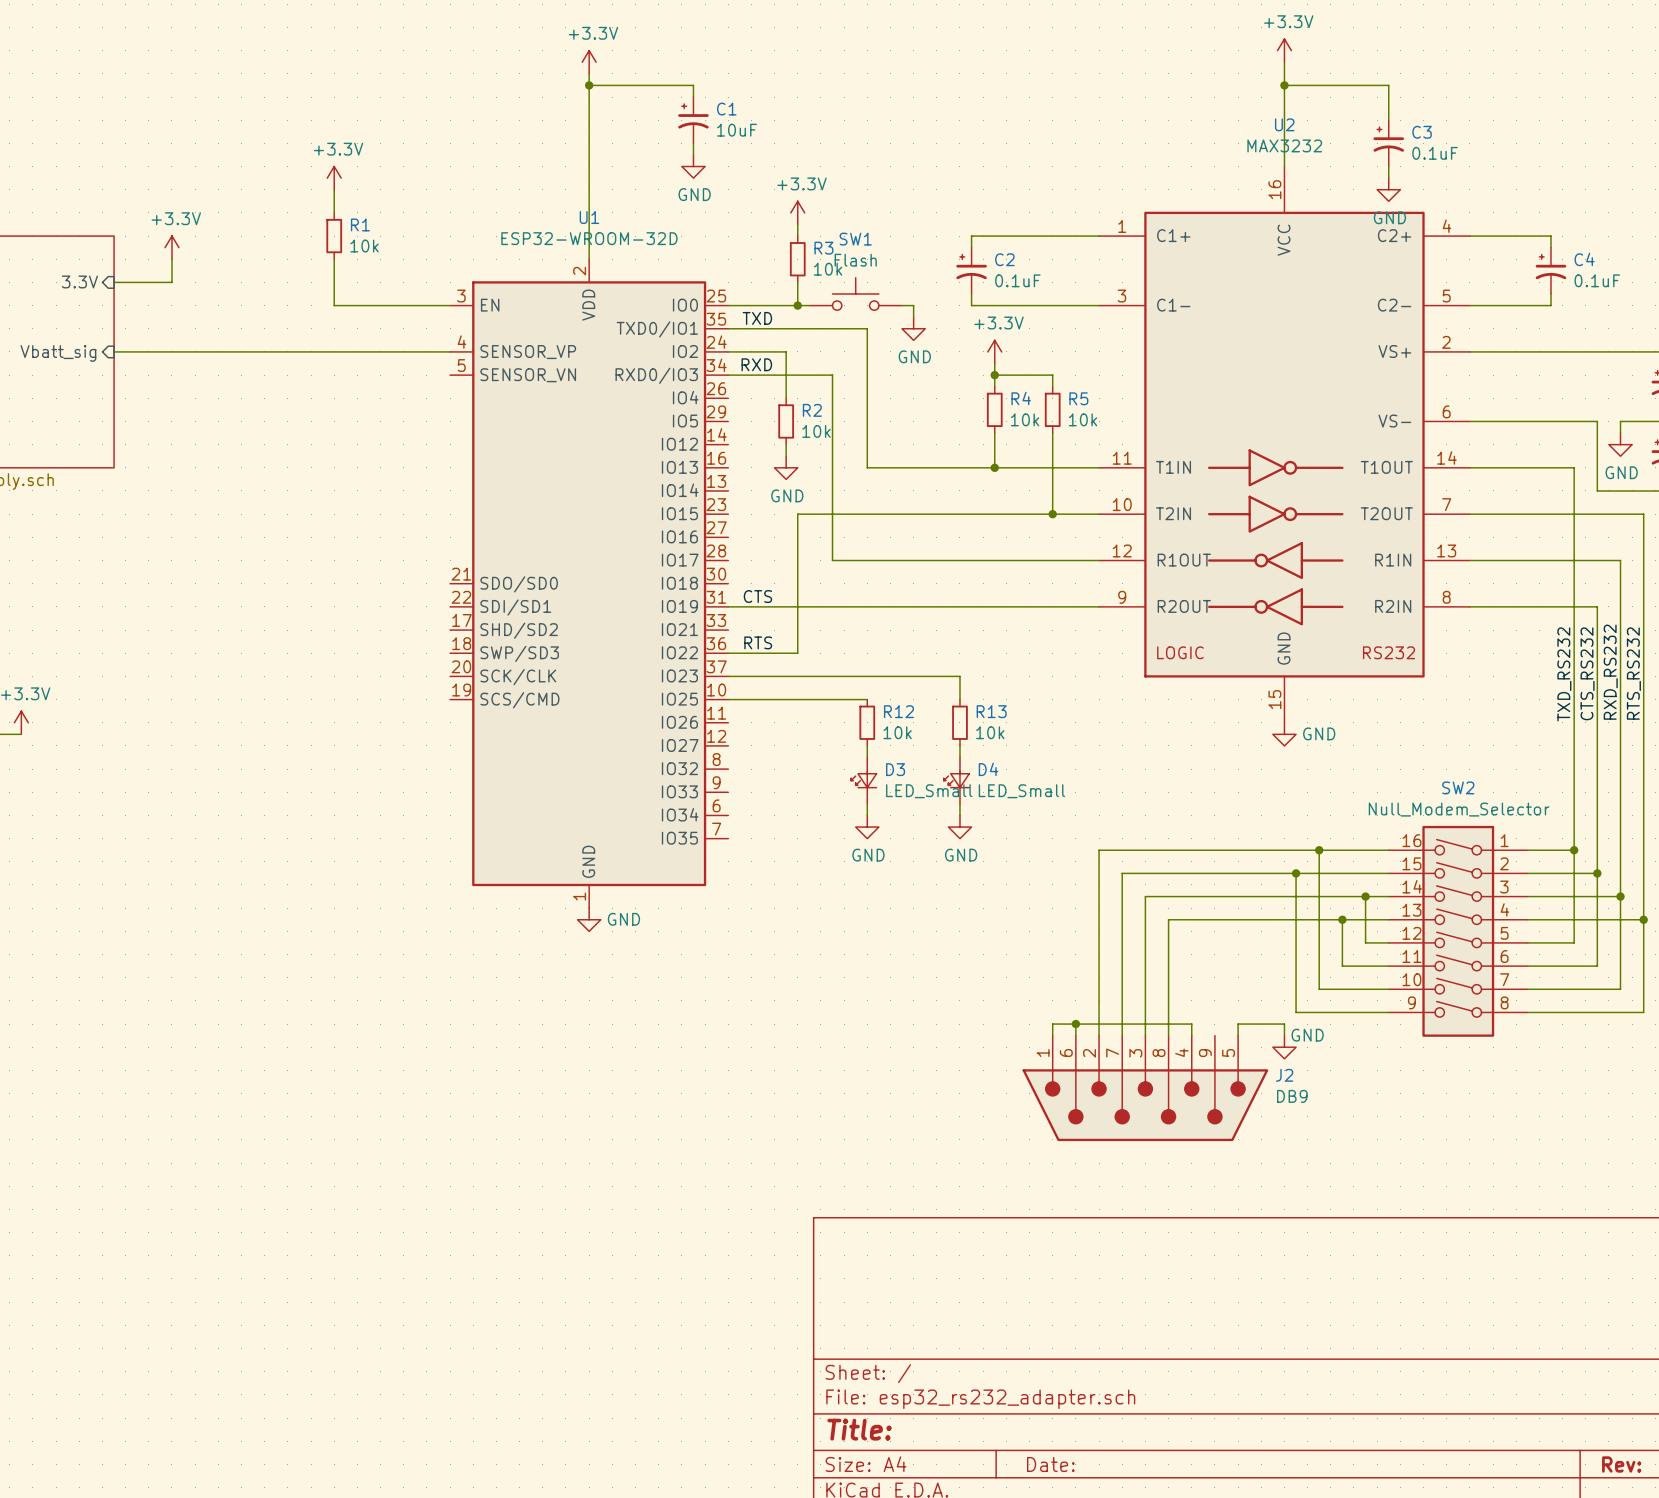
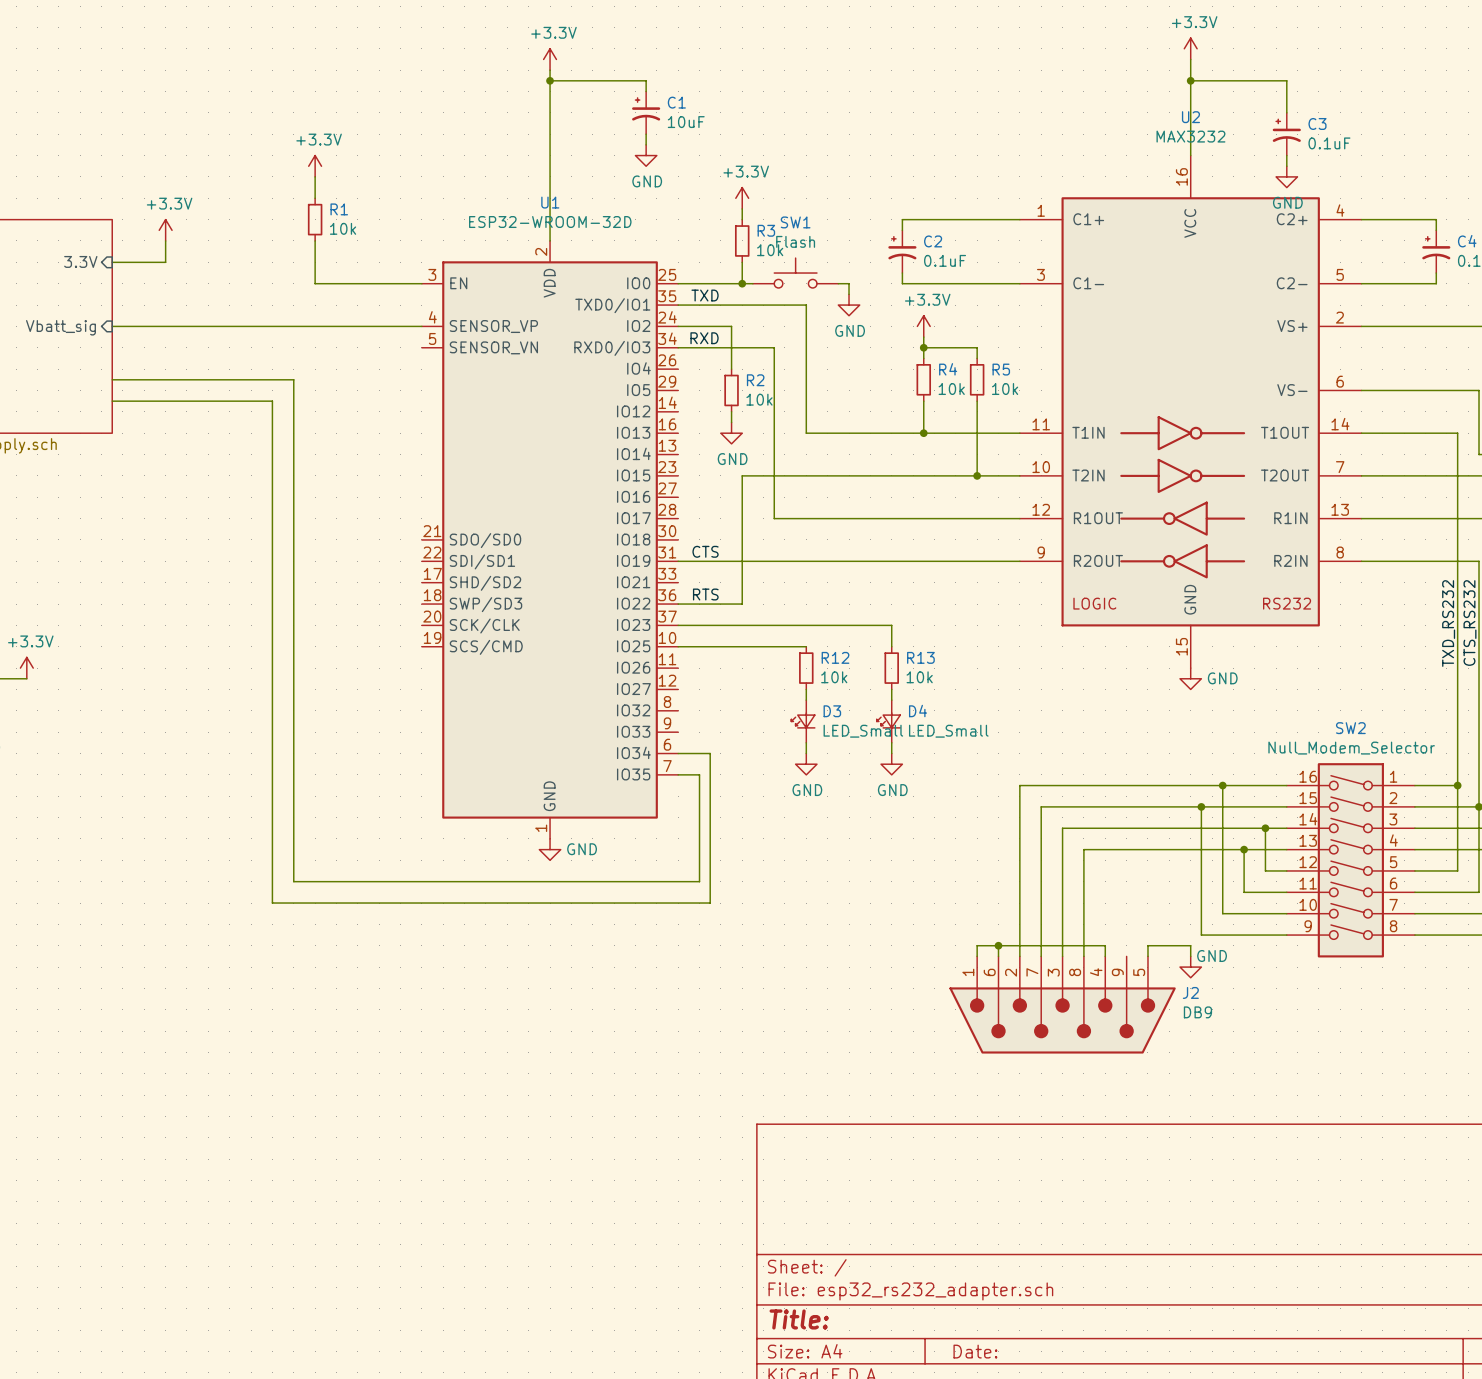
wire: none -> (112, 379) (293, 379) (293, 881) (699, 881) (699, 774) (678, 774)
wire: none -> (112, 401) (272, 401) (272, 903) (710, 903) (710, 753) (678, 753)

